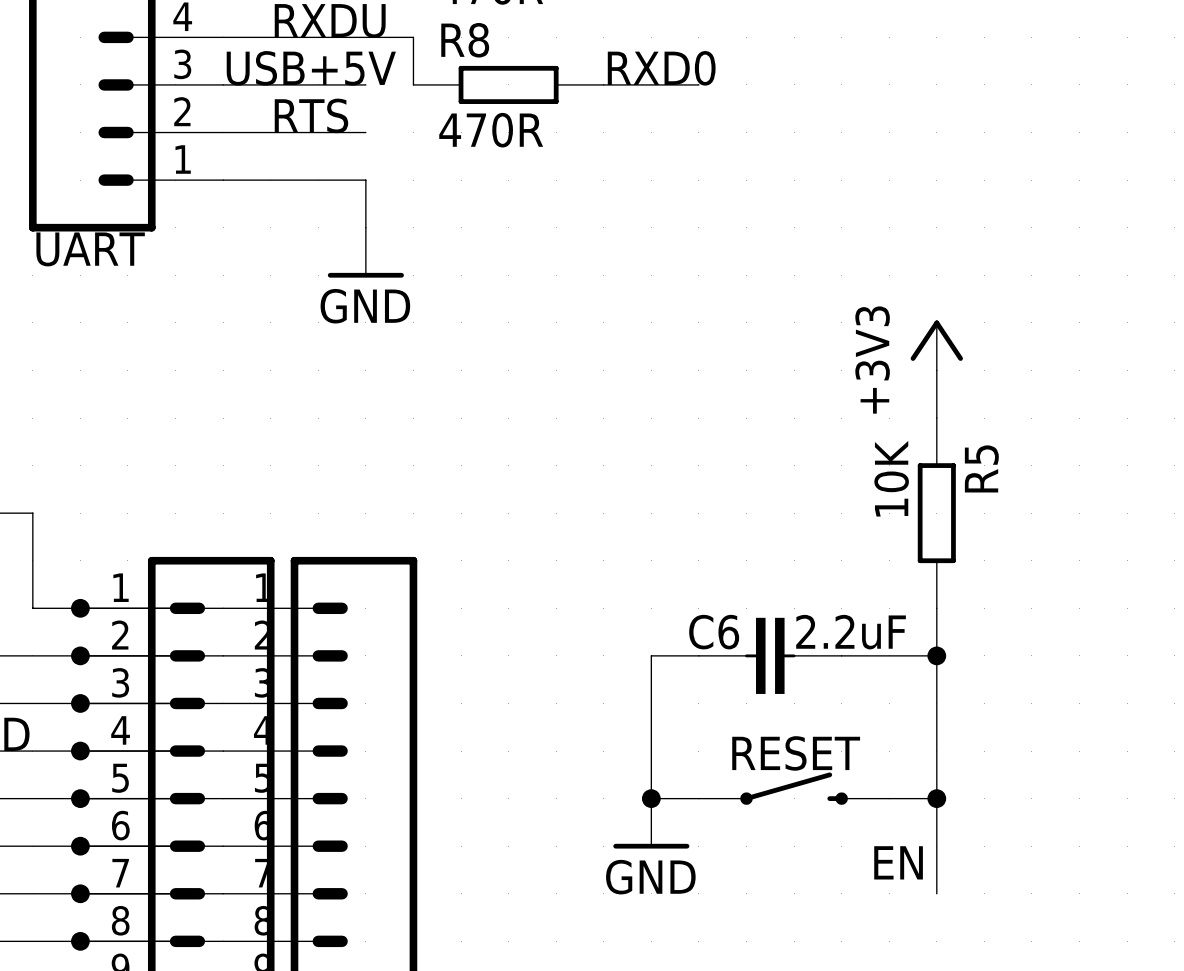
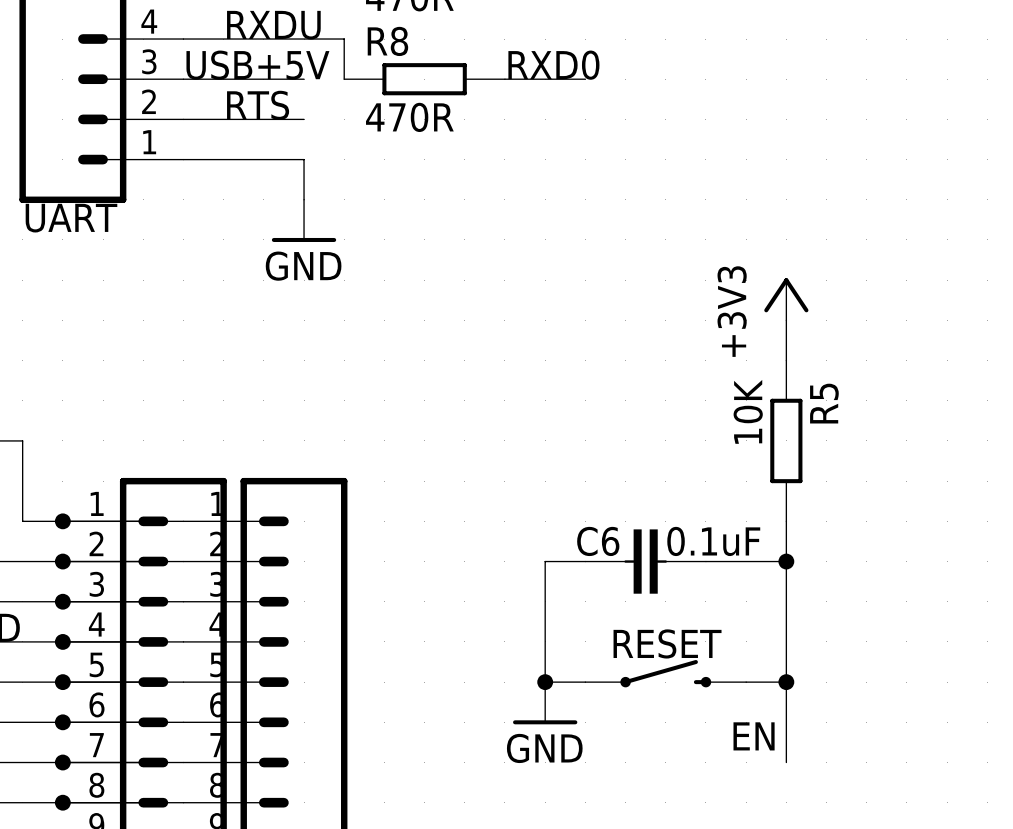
C6 value: 2.2uF (851, 632) -> 0.1uF (713, 541)

